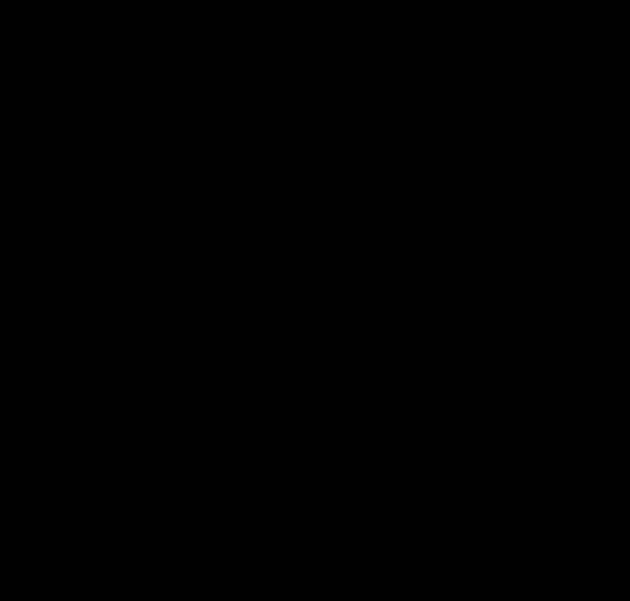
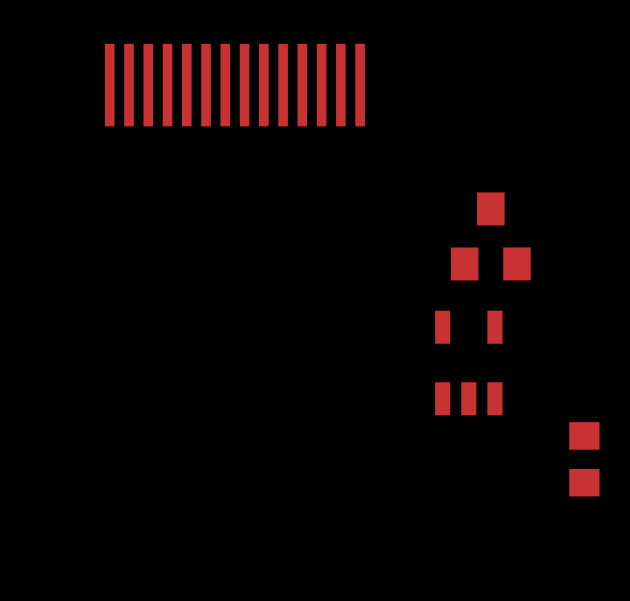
part: none -> (234, 85)
part: none -> (490, 236)
part: none -> (468, 363)
part: none -> (584, 459)

